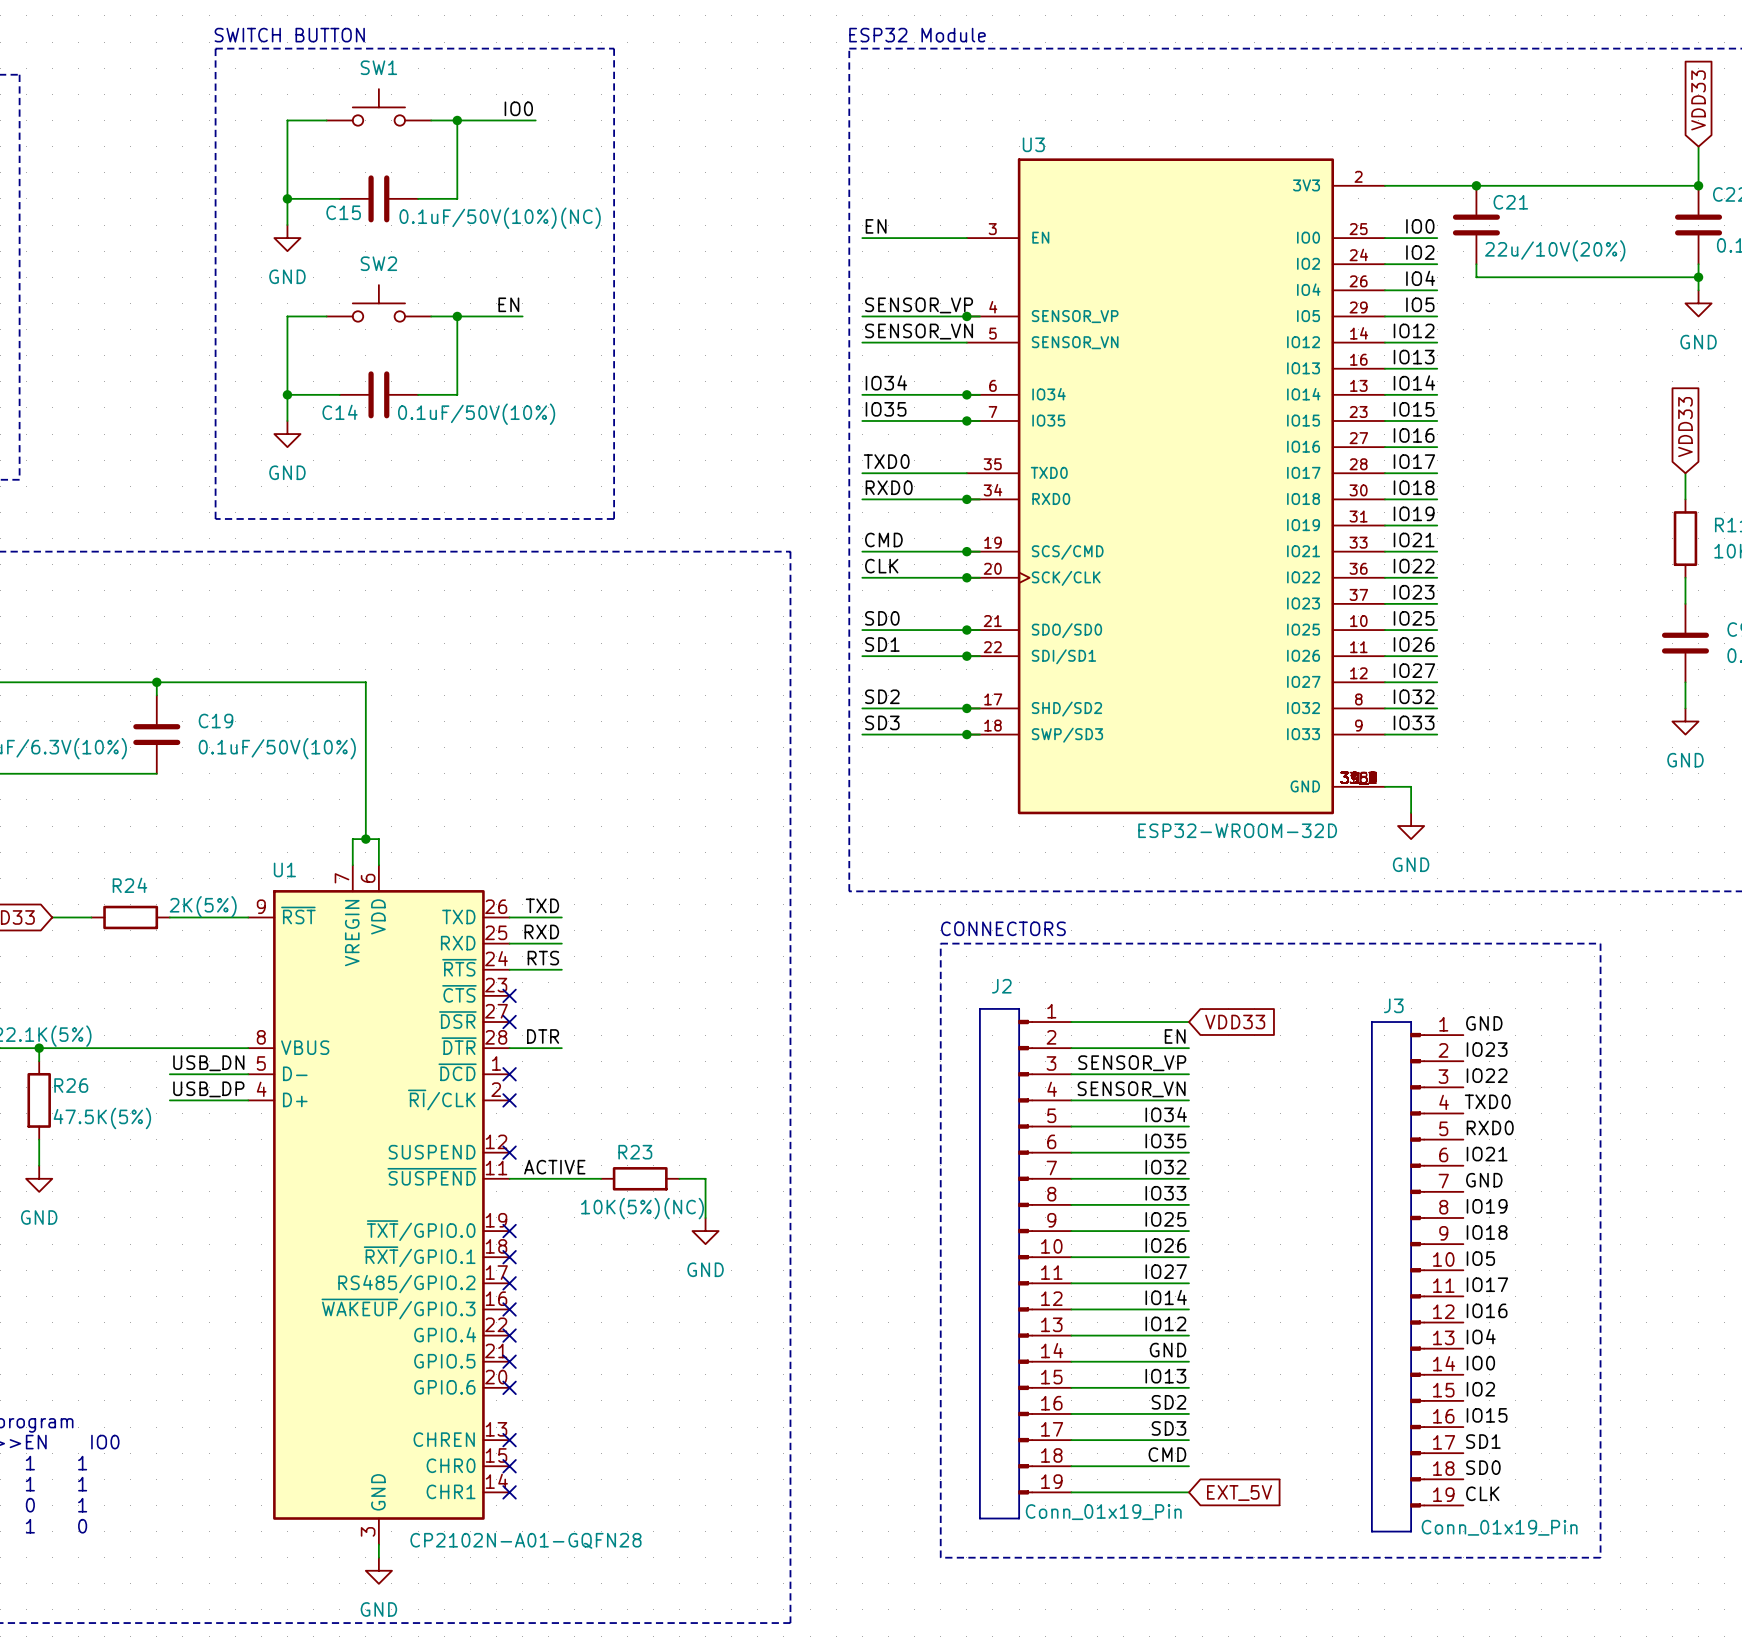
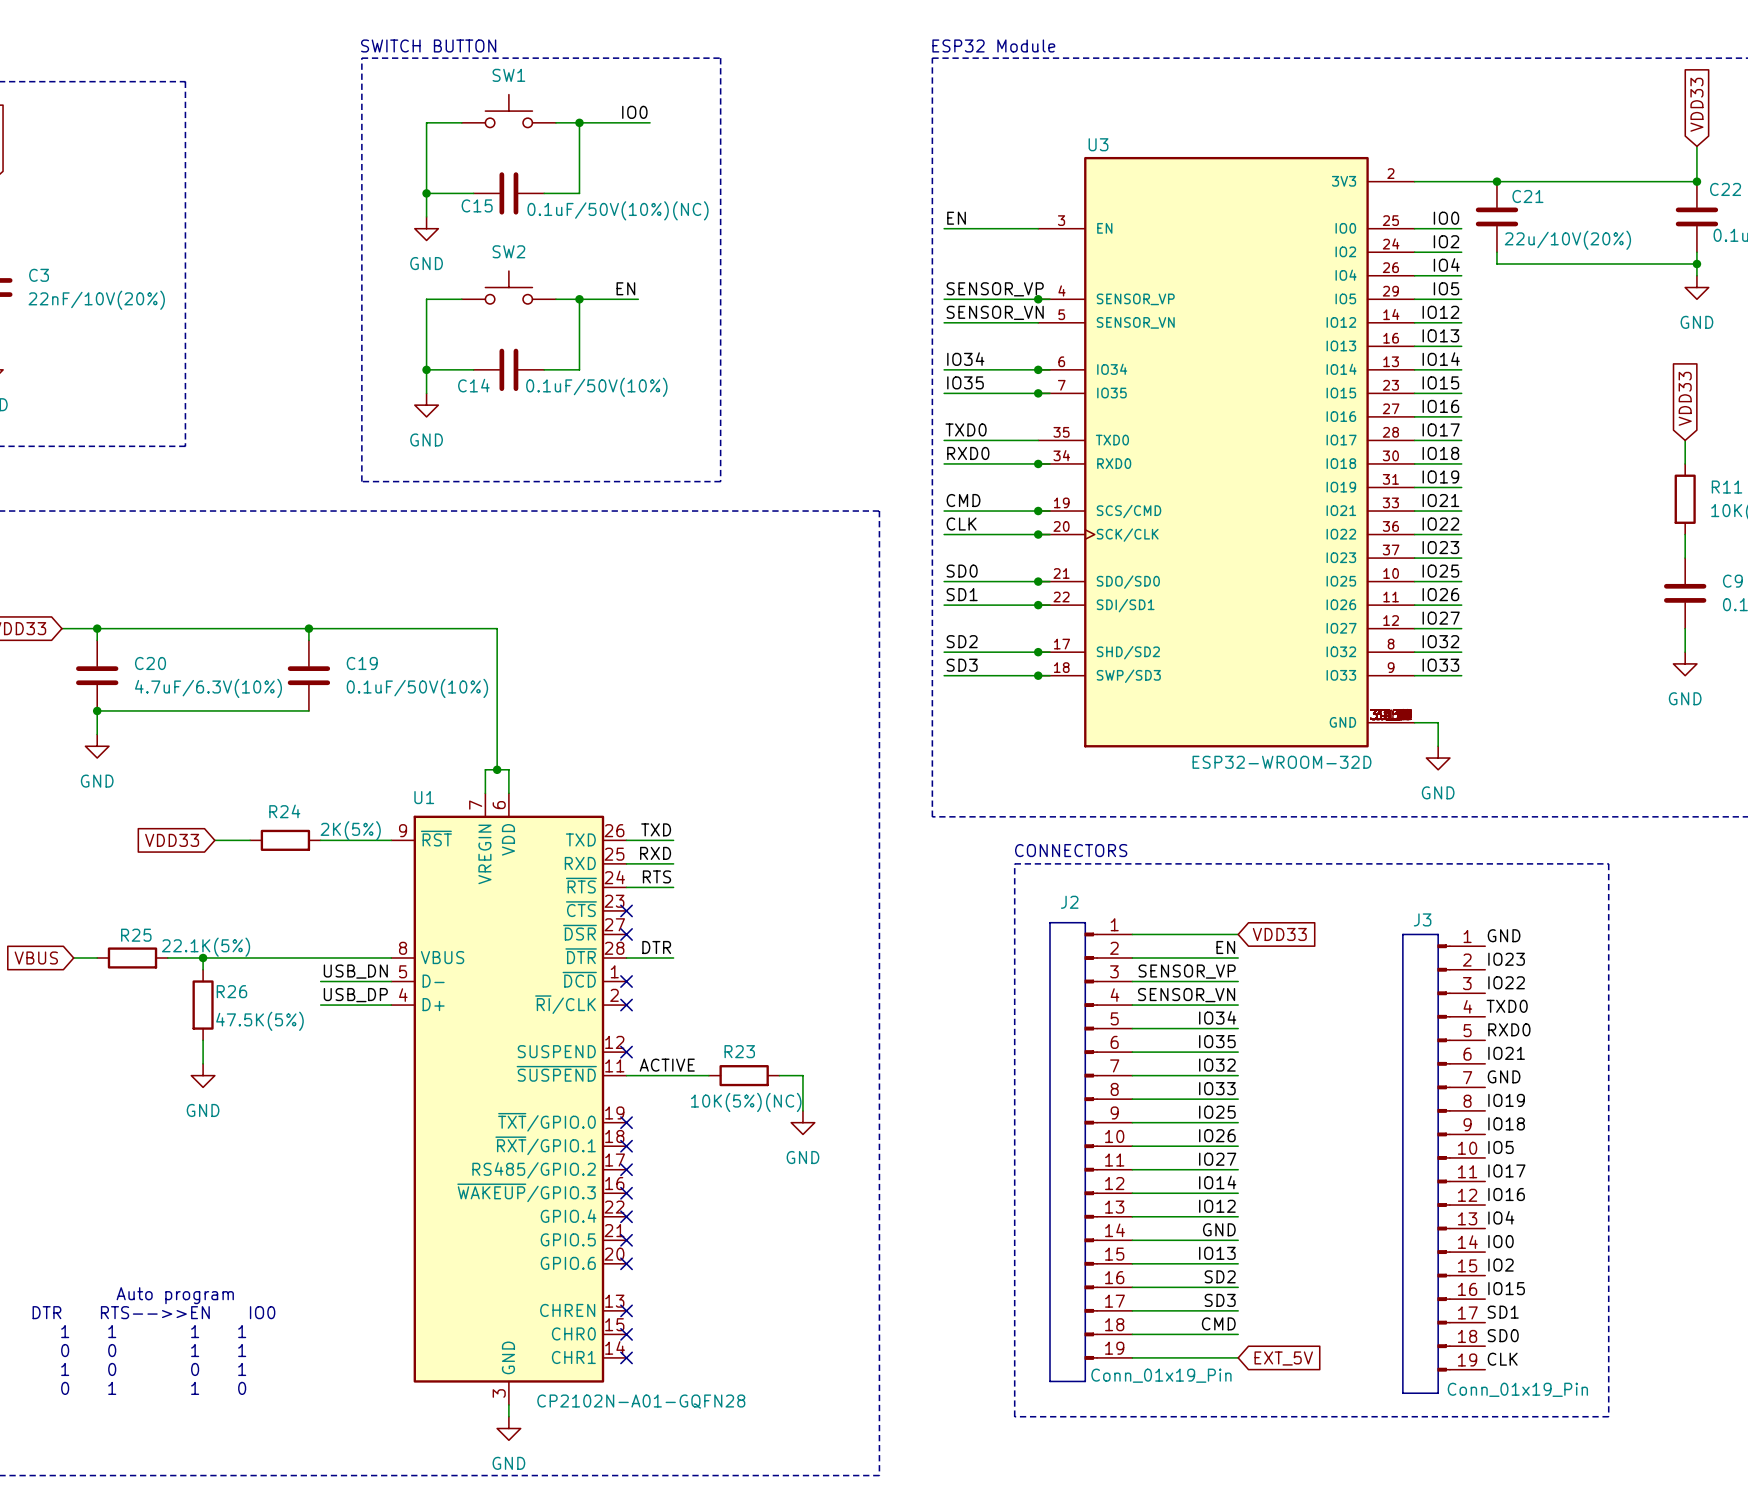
U3 symbol: [966, 158, 1385, 815] -> [1038, 156, 1415, 748]

